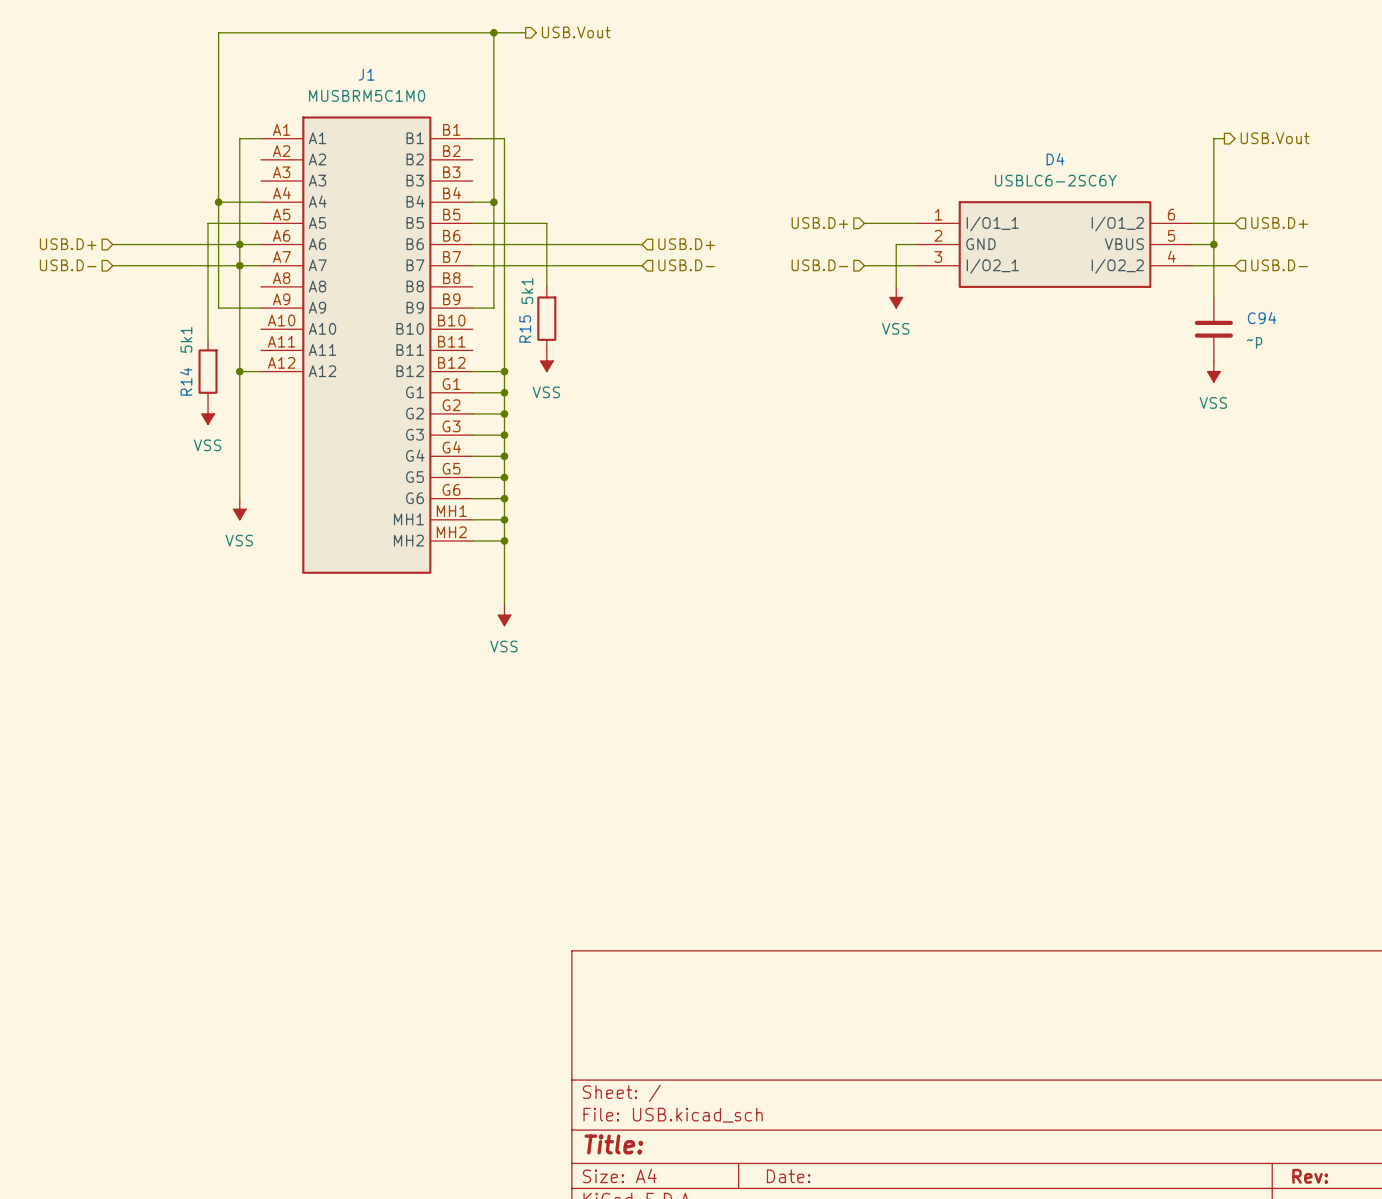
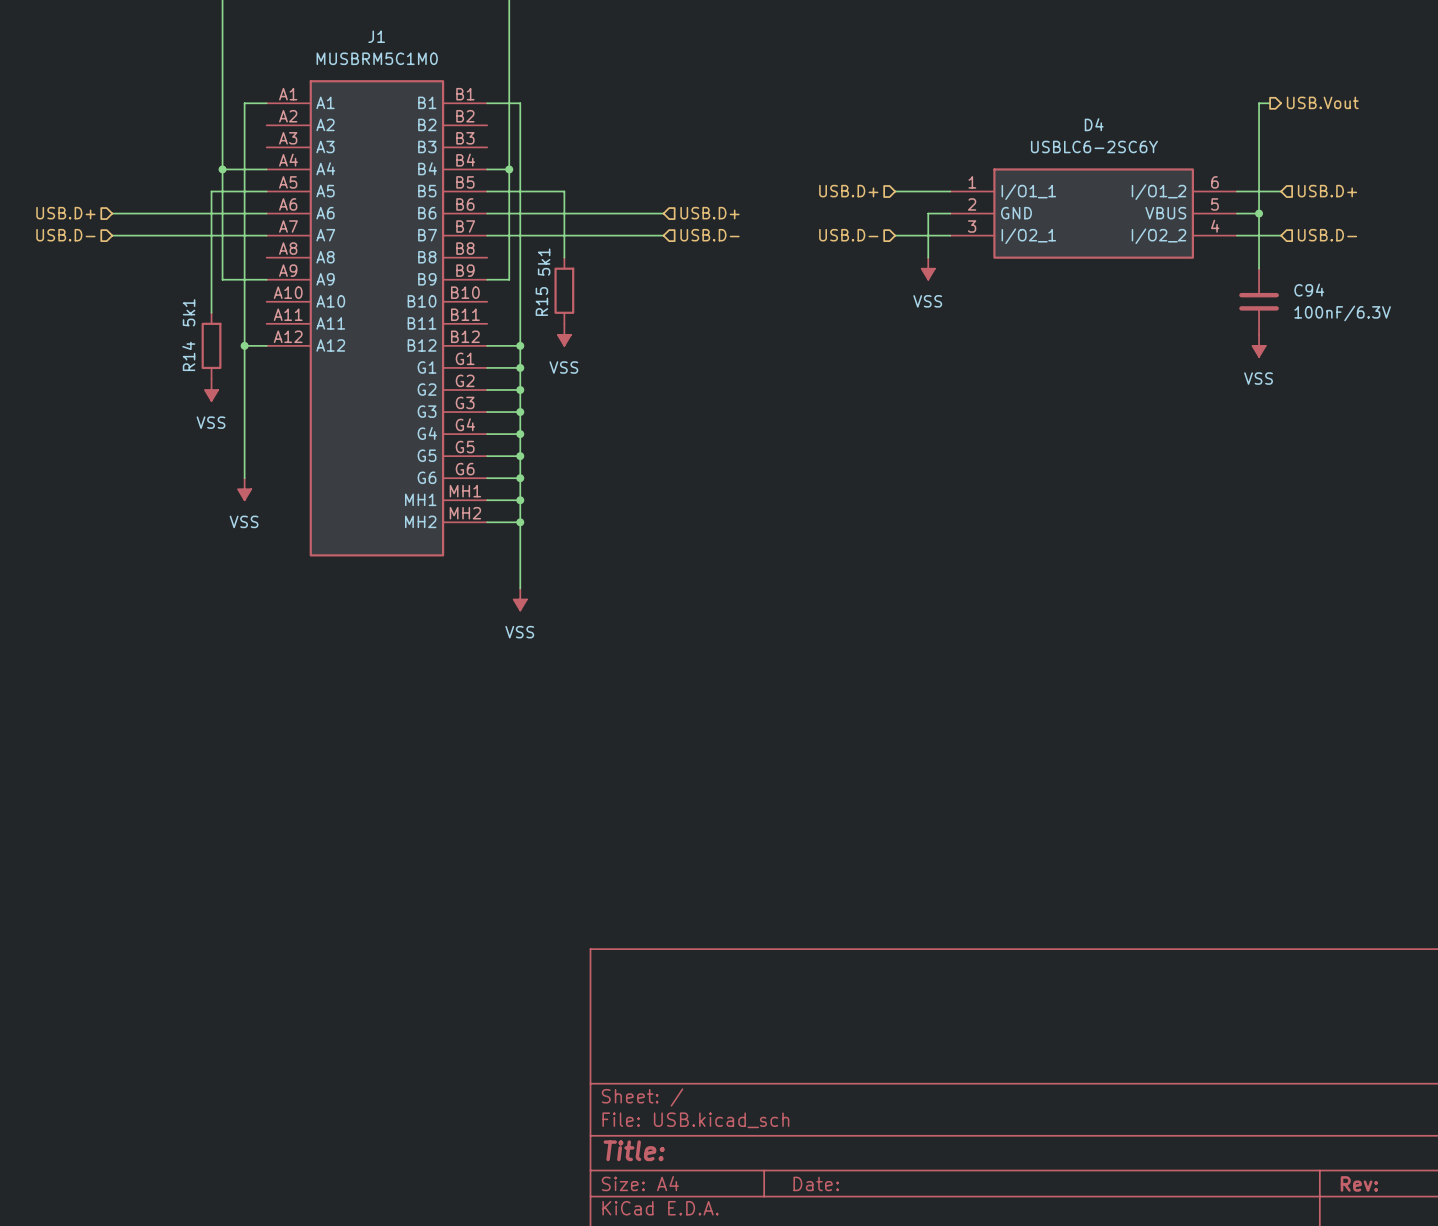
junction: (239, 244) -> none
junction: (239, 265) -> none
C94 value: ~p (1254, 342) -> 100nF/6.3V (1342, 313)

